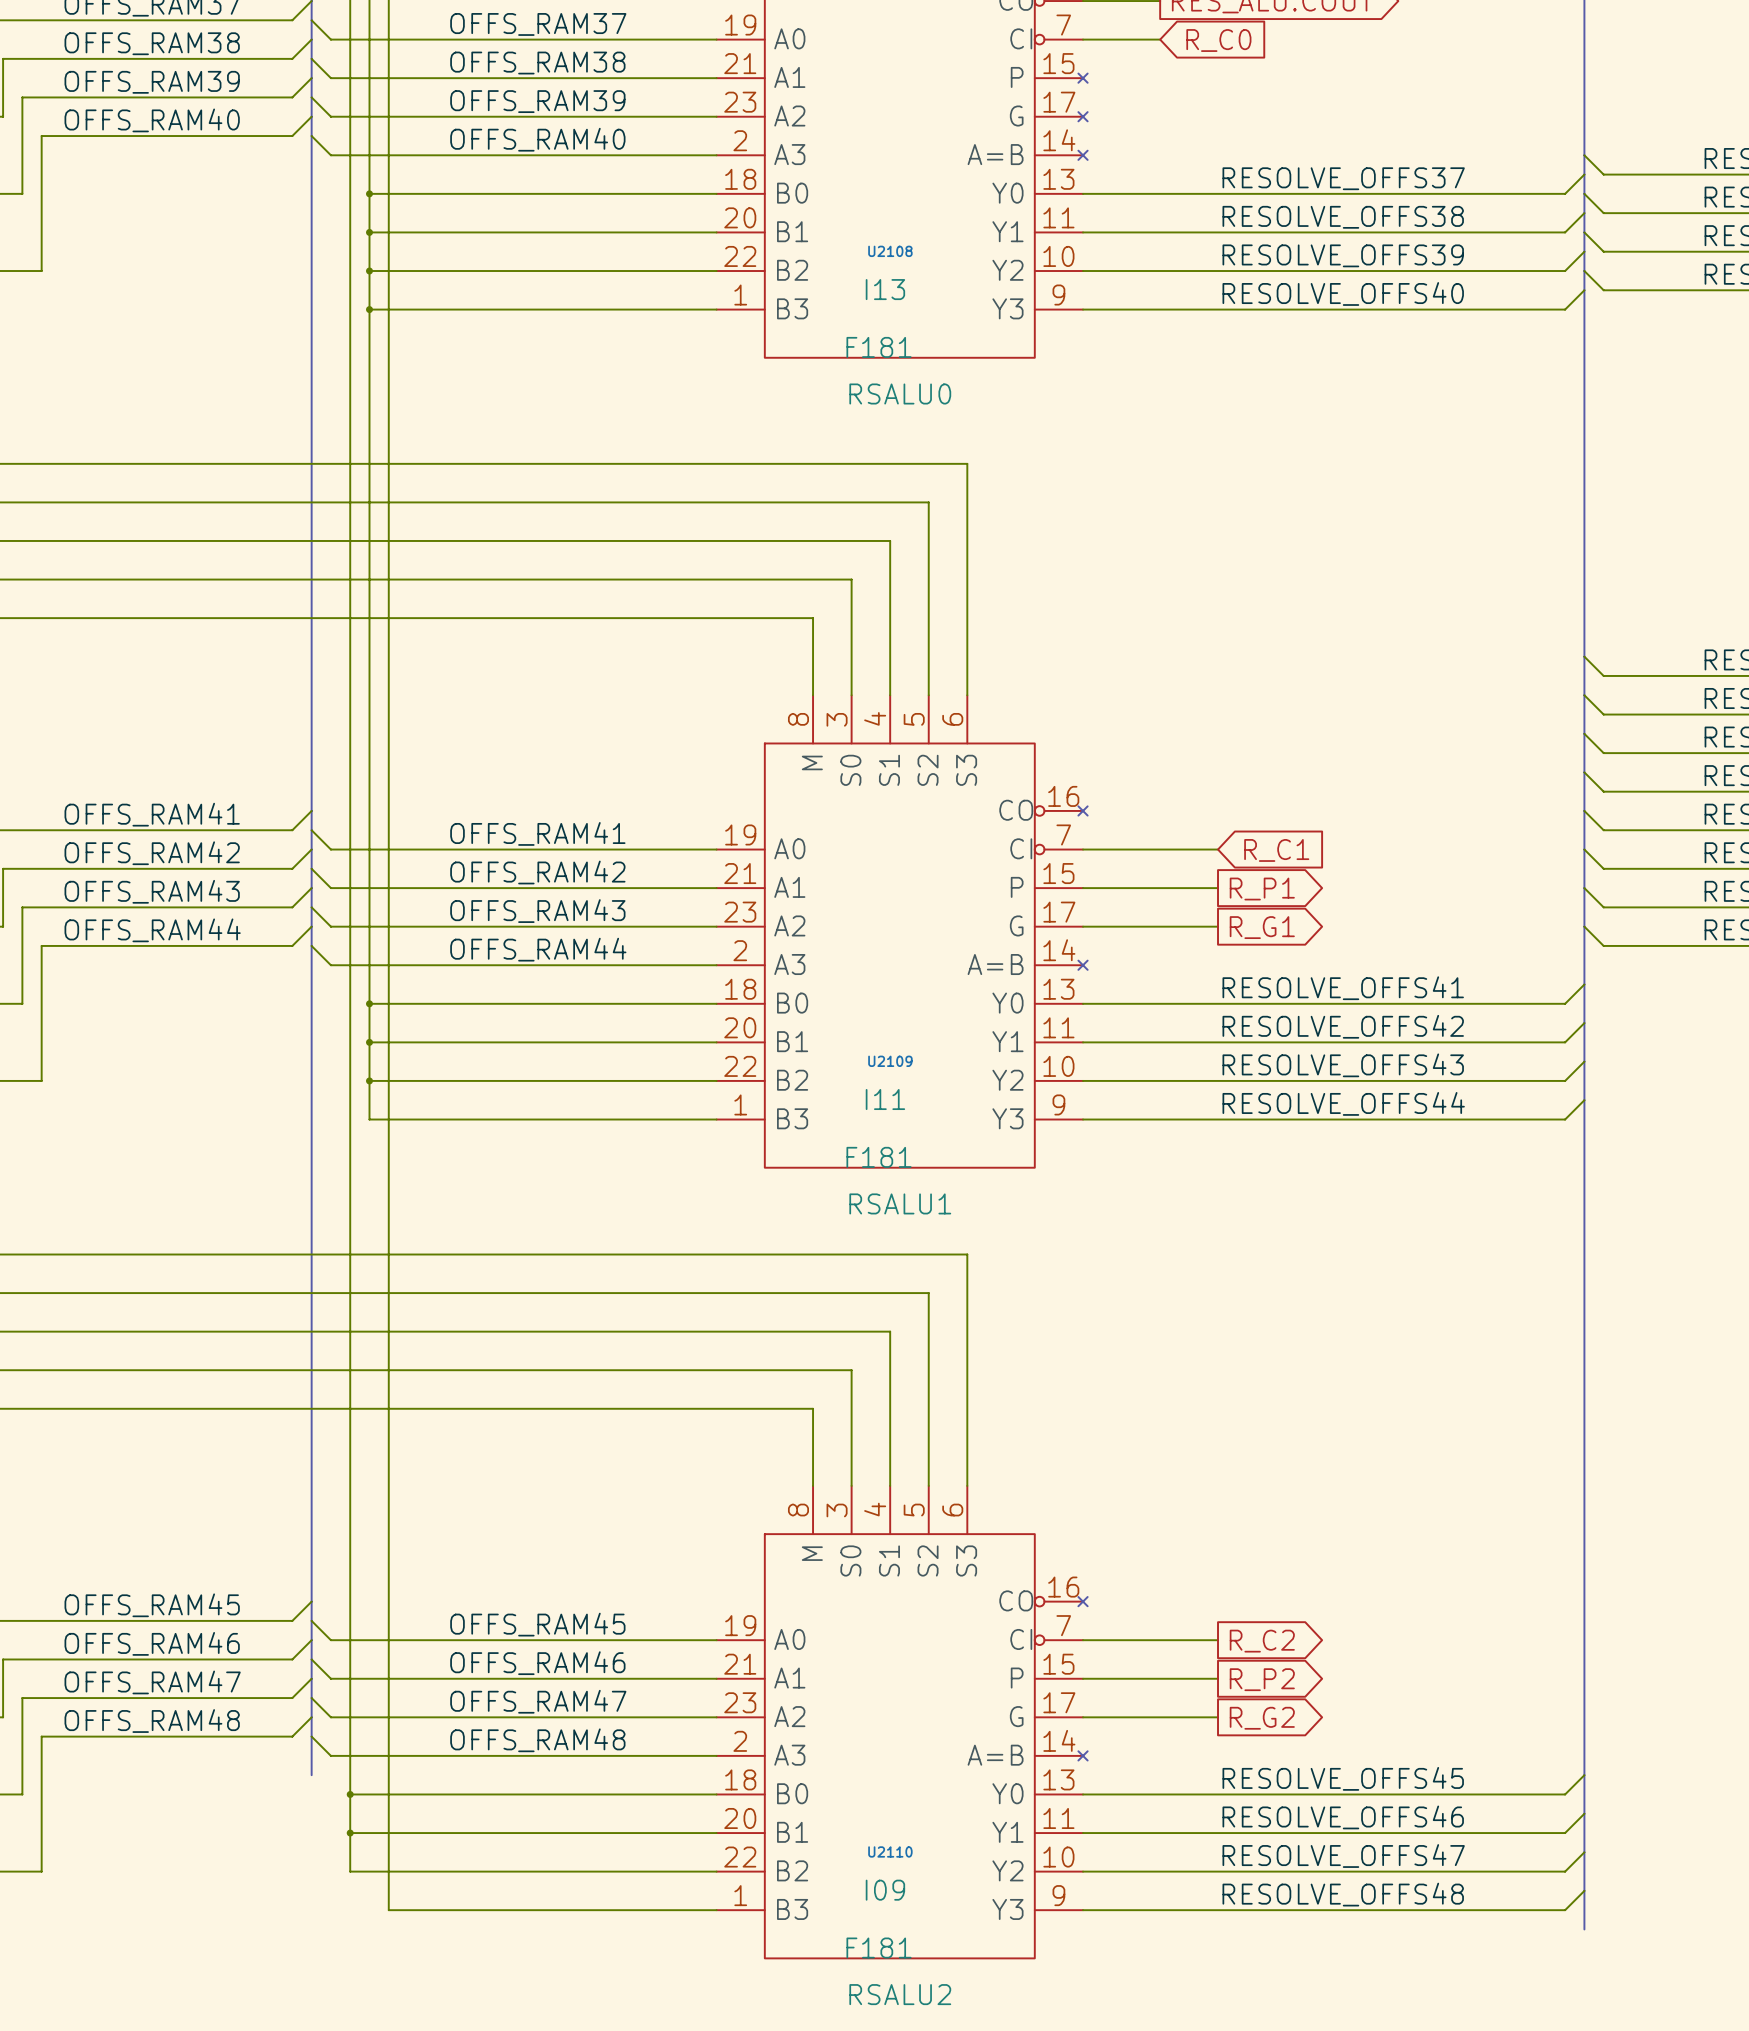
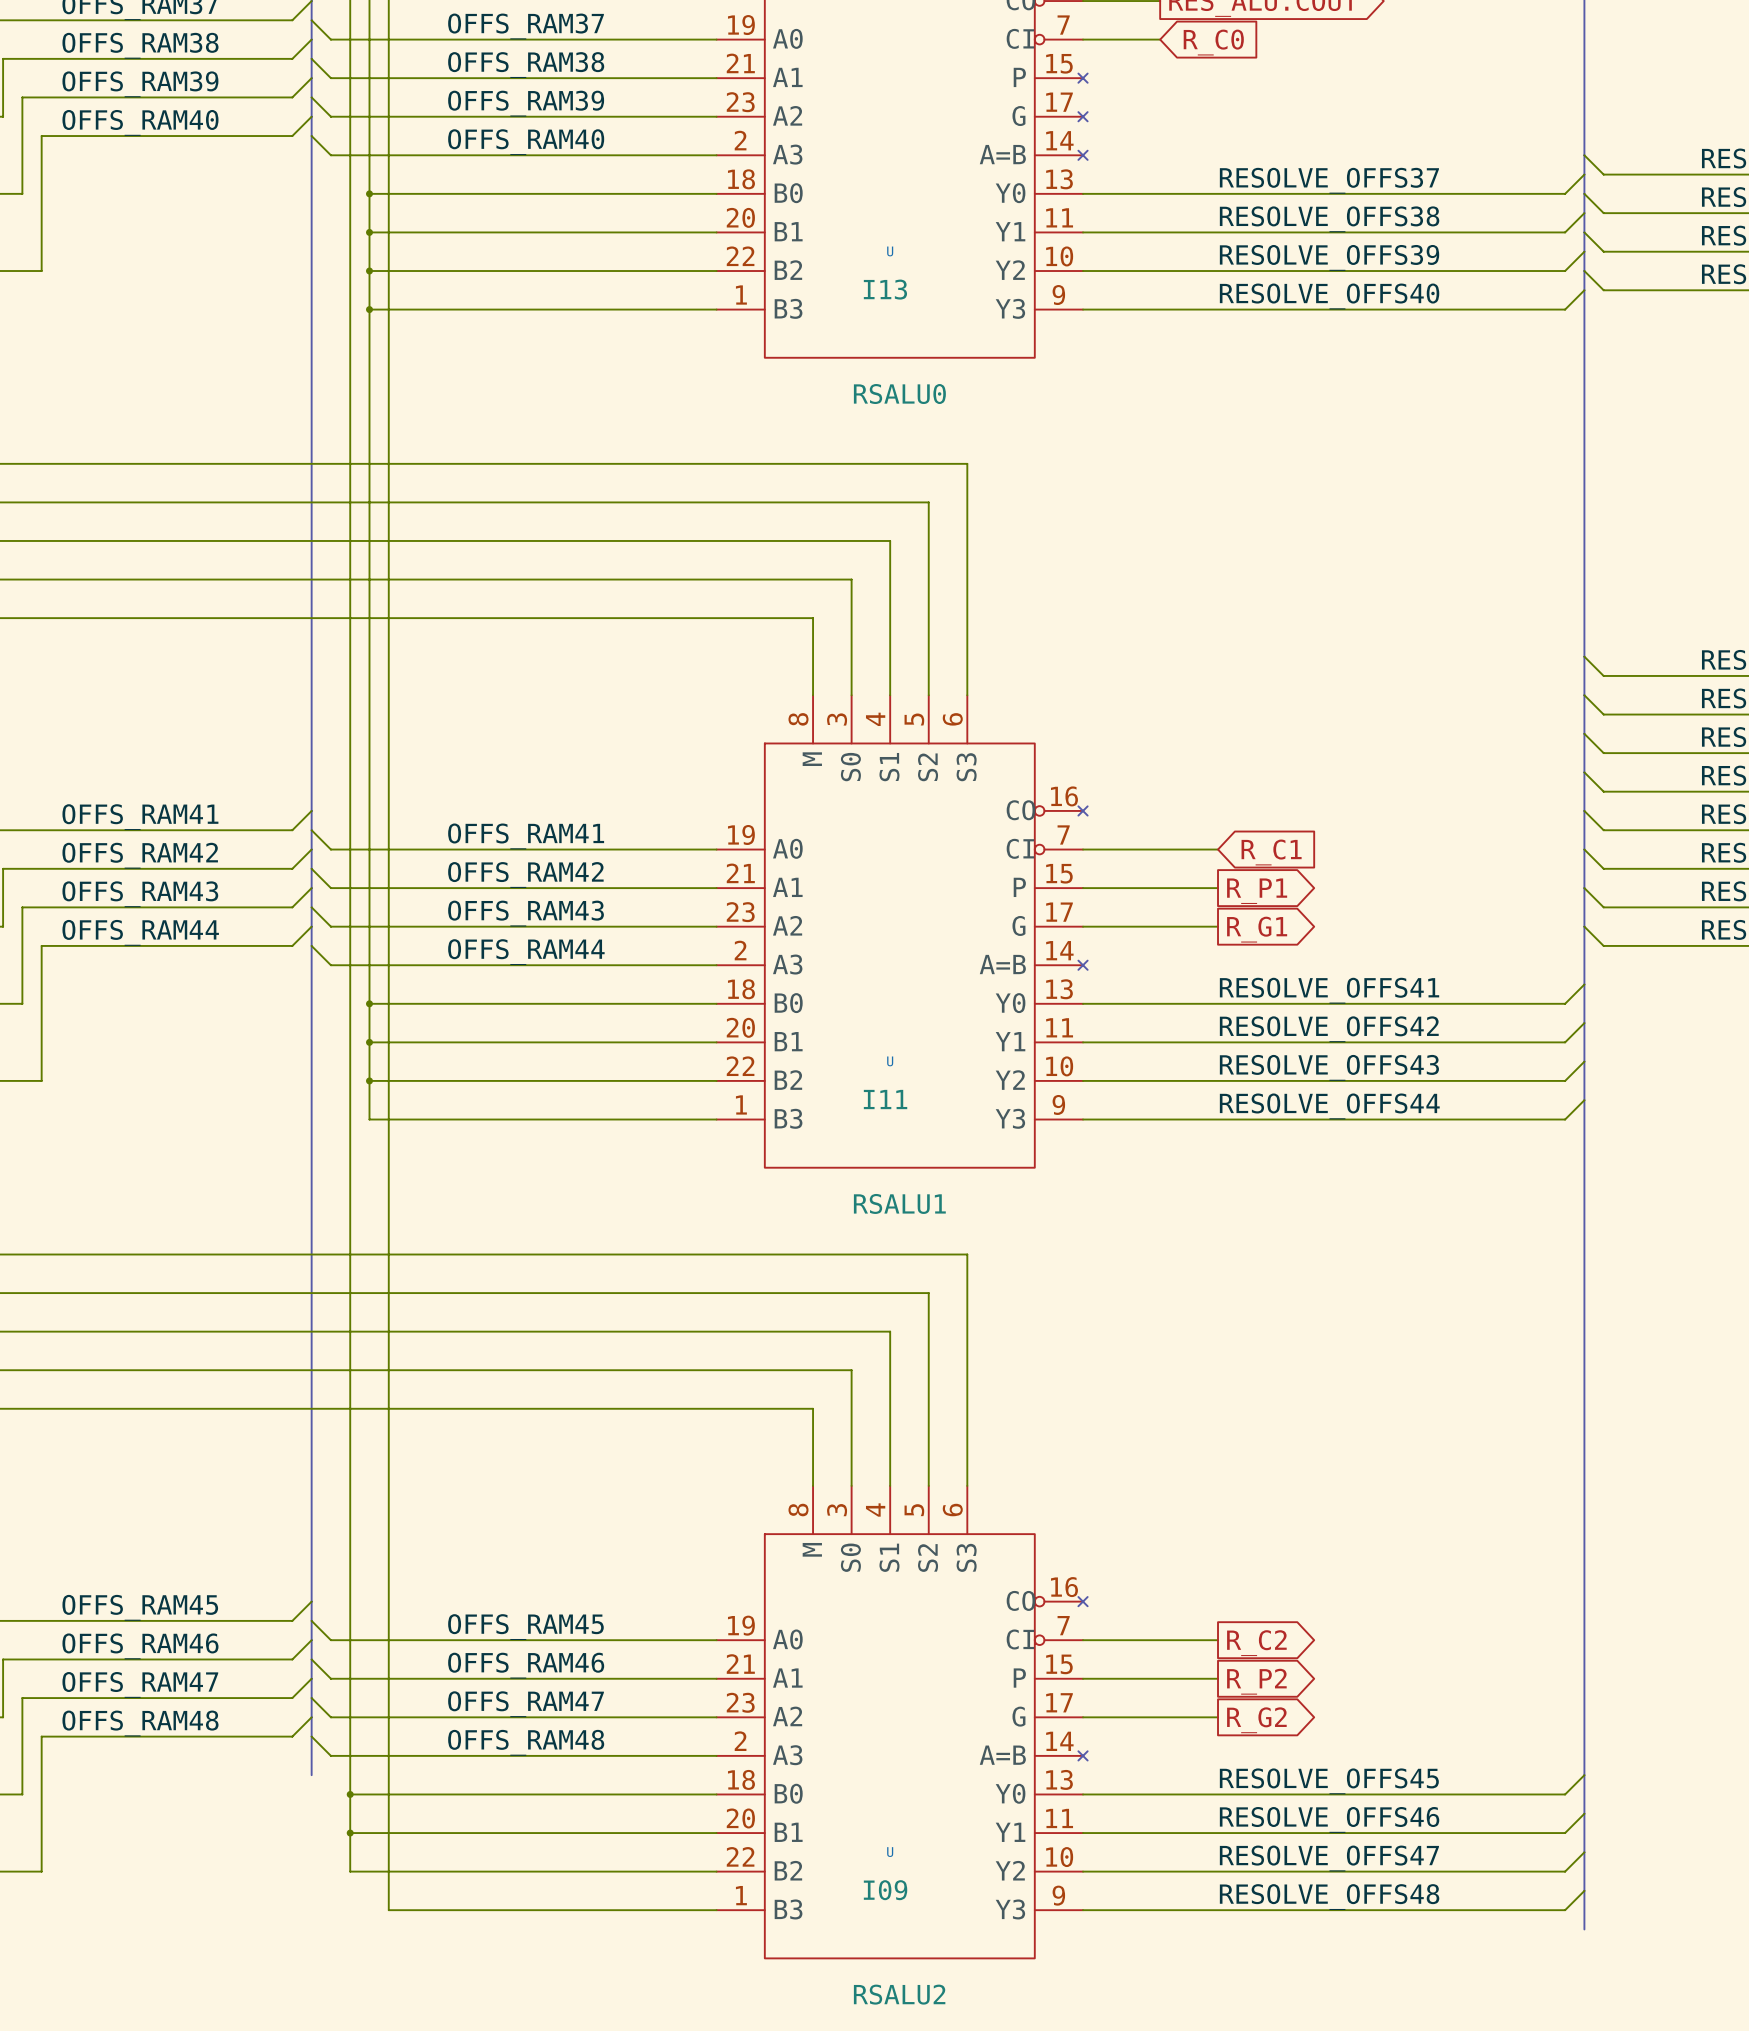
U2108 name: U2108 (890, 251) -> U (890, 251)
U2108 value: F181 (879, 347) -> none
U2109 name: U2109 (890, 1061) -> U (890, 1061)
U2109 value: F181 (879, 1157) -> none
U2110 name: U2110 (890, 1851) -> U (890, 1852)
U2110 value: F181 (879, 1948) -> none

